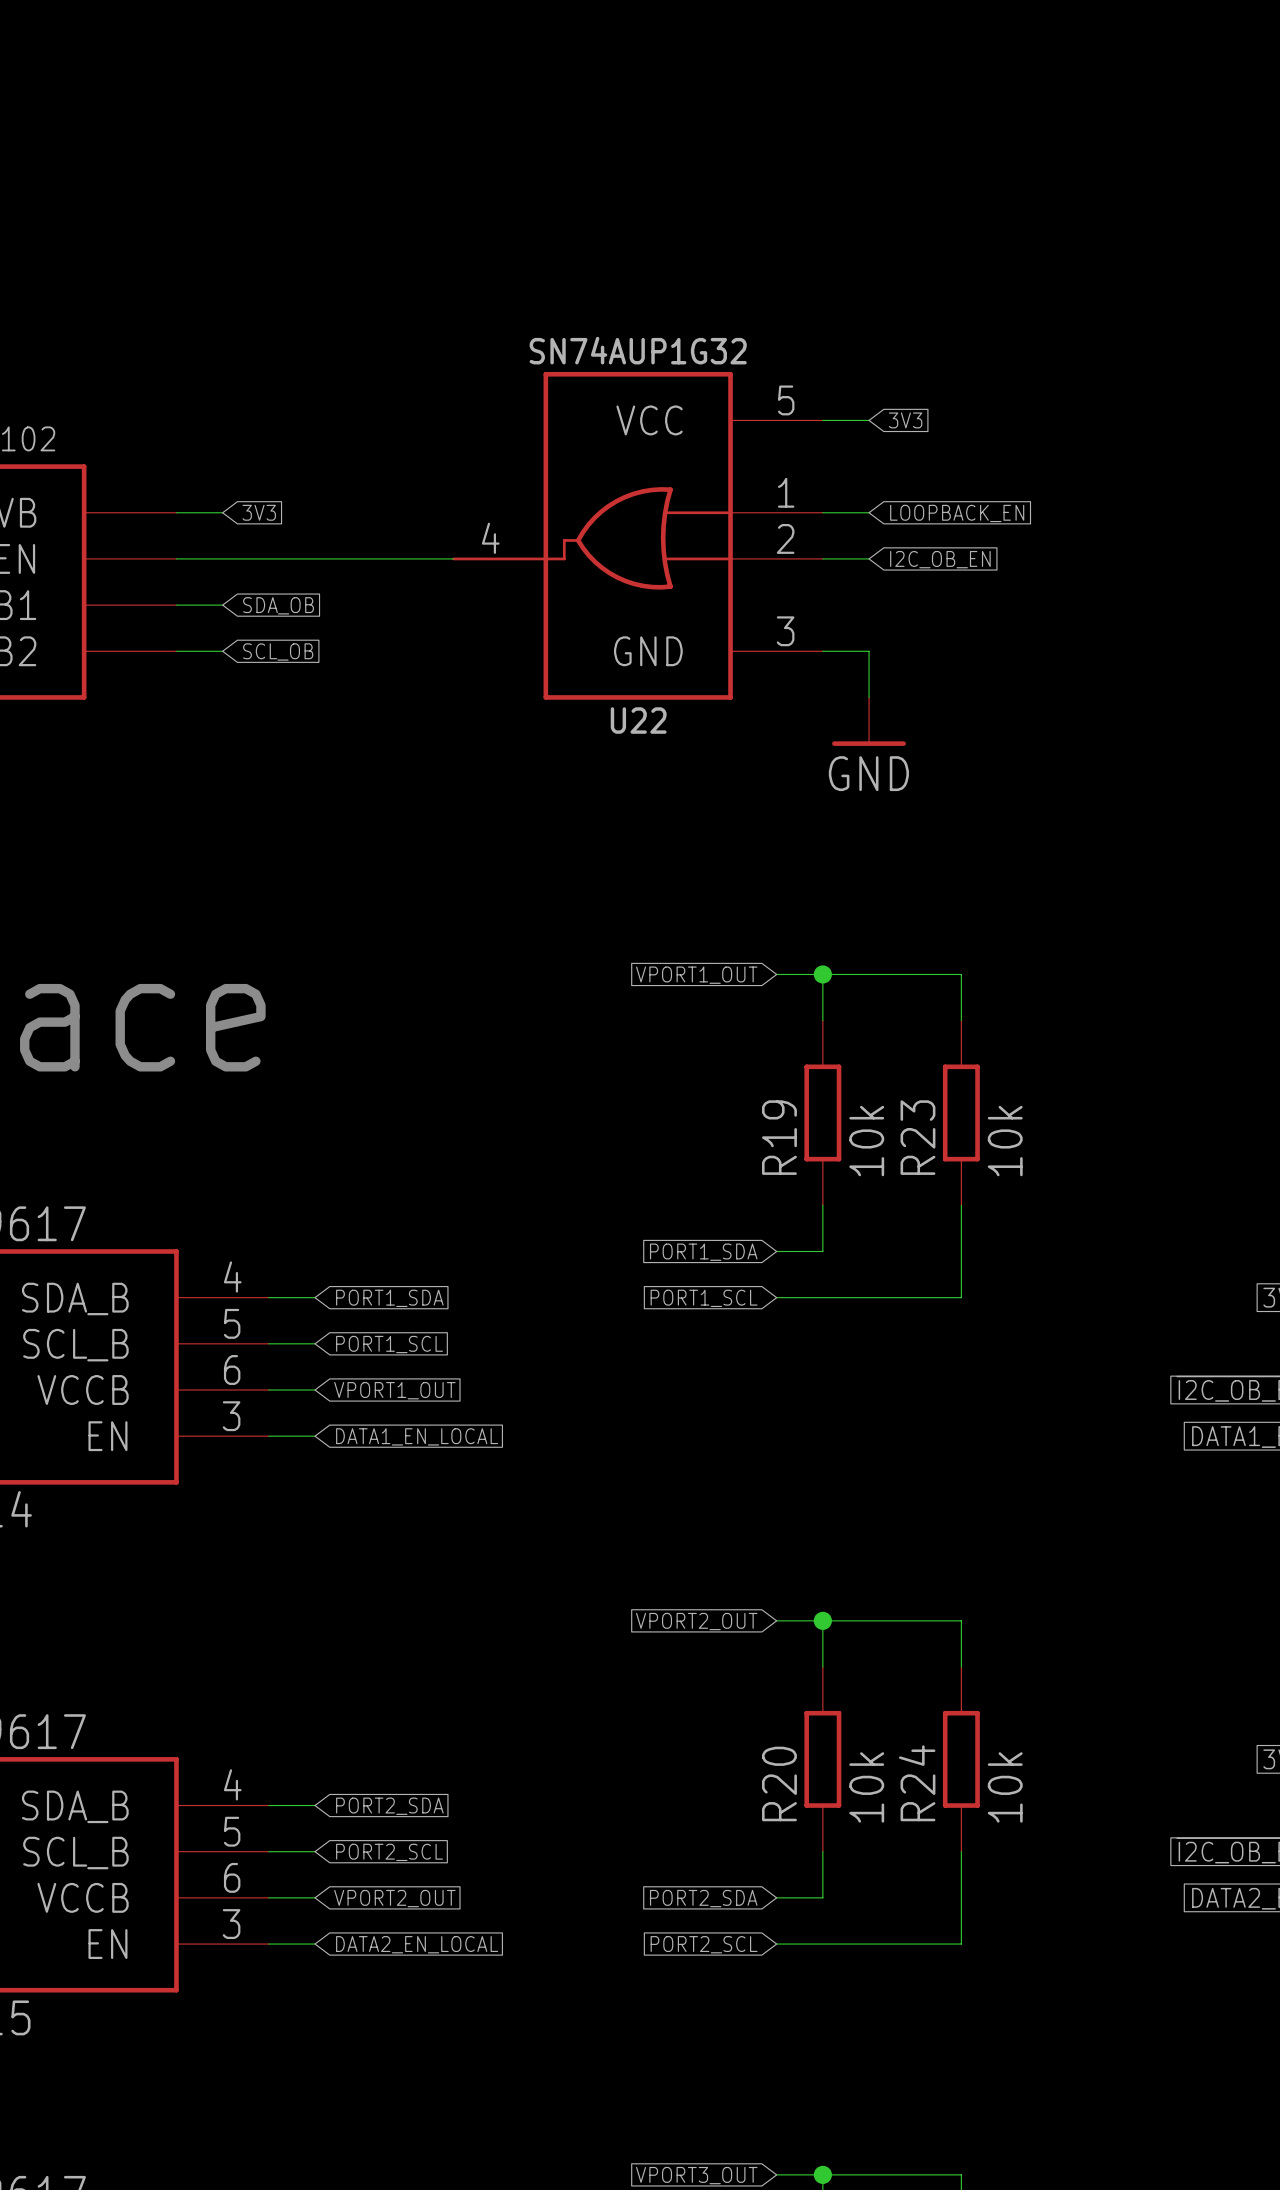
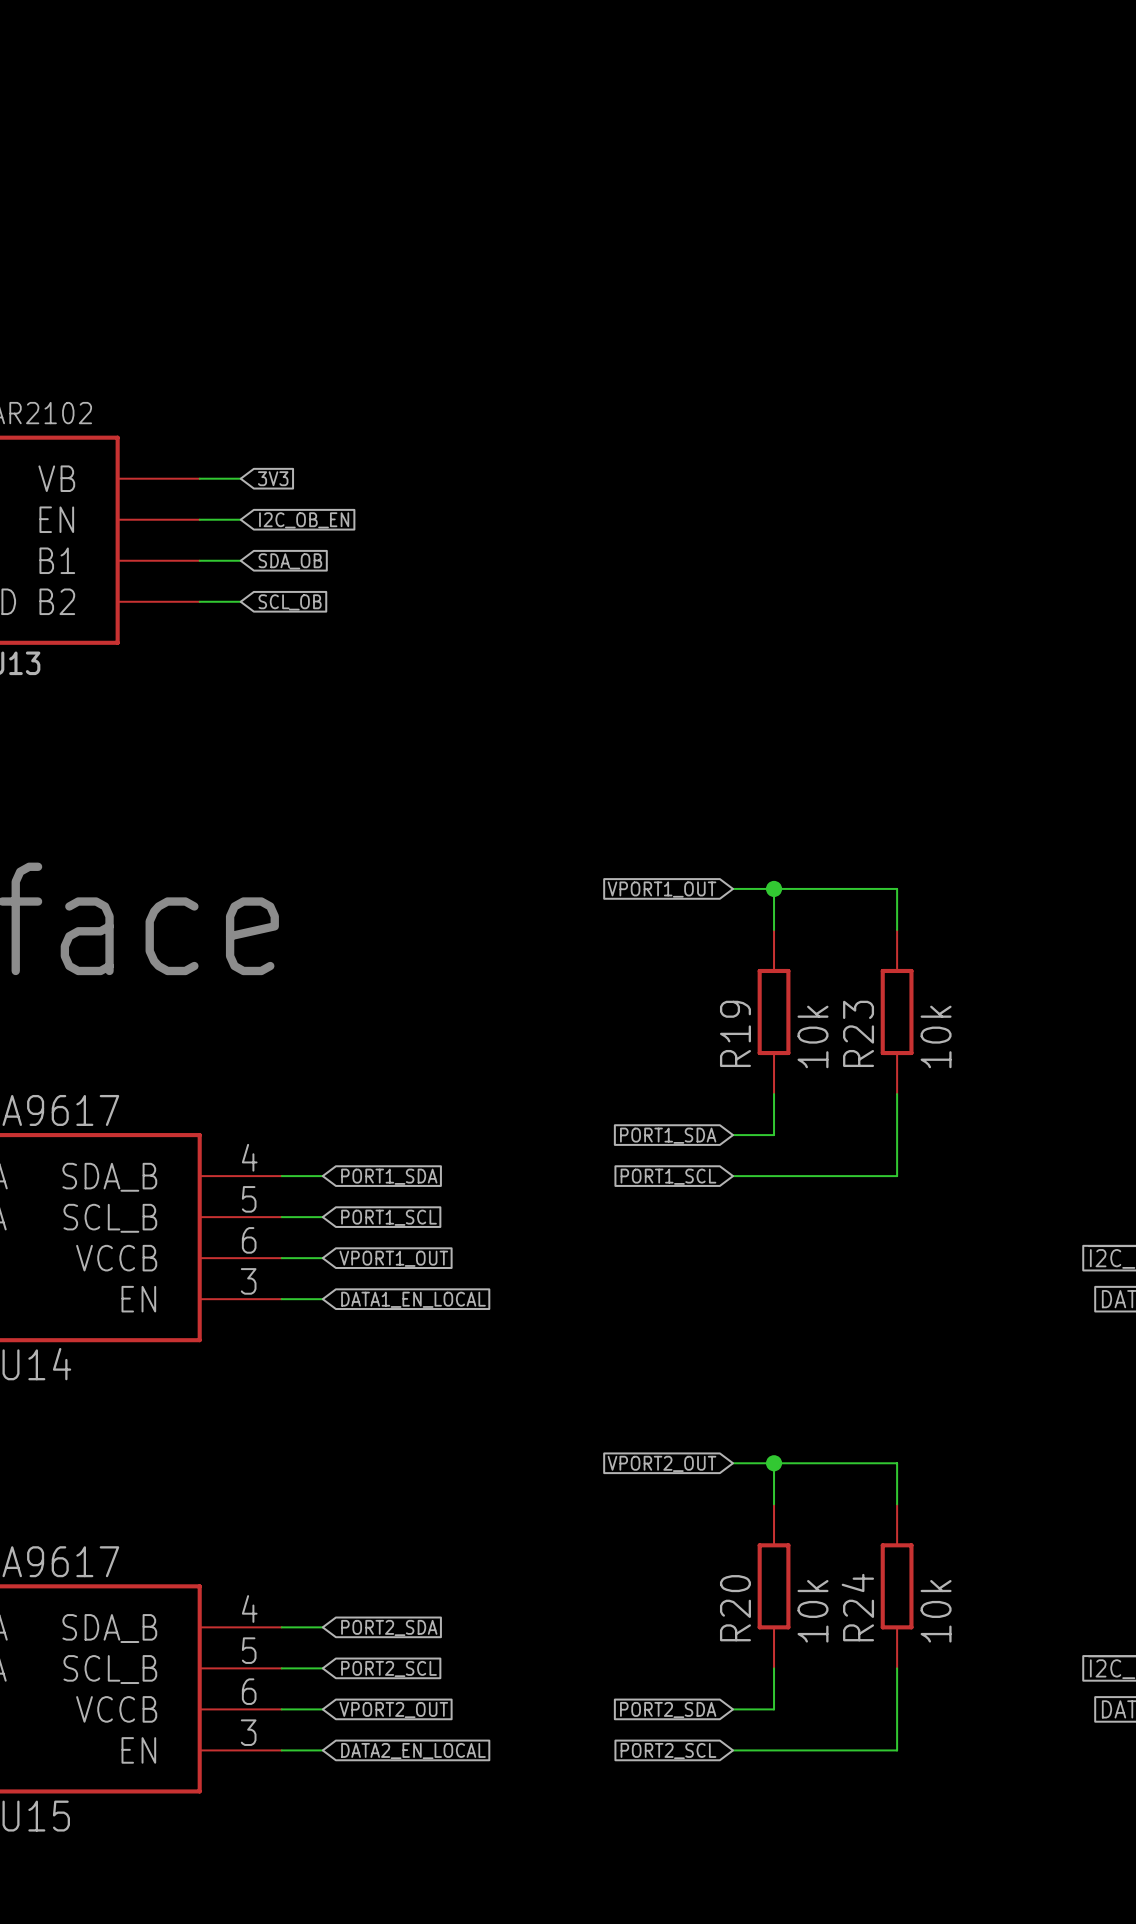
wire: (822, 420) (869, 420) -> none
global label: 3V3 (905, 420) -> none
wire: (822, 512) (869, 512) -> none
global label: LOOPBACK_EN (957, 513) -> none
U22: (637, 535) -> none
wire: (222, 558) (453, 558) -> none
wire: (822, 558) (869, 558) -> none
global label: none -> I2C_OB_EN (304, 520)
global label: I2C_OB_EN (940, 559) -> none
wire: (822, 651) (869, 651) (869, 697) -> none
power symbol: GND (869, 721) -> none

